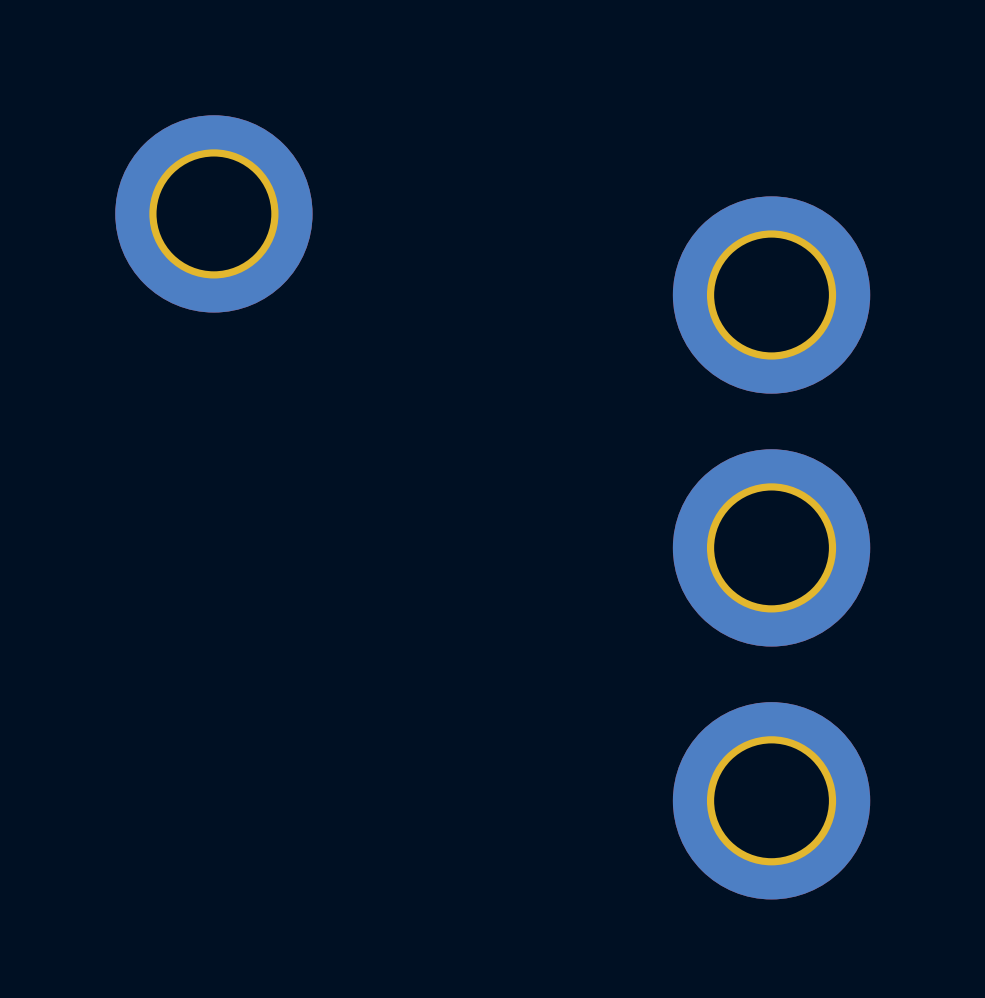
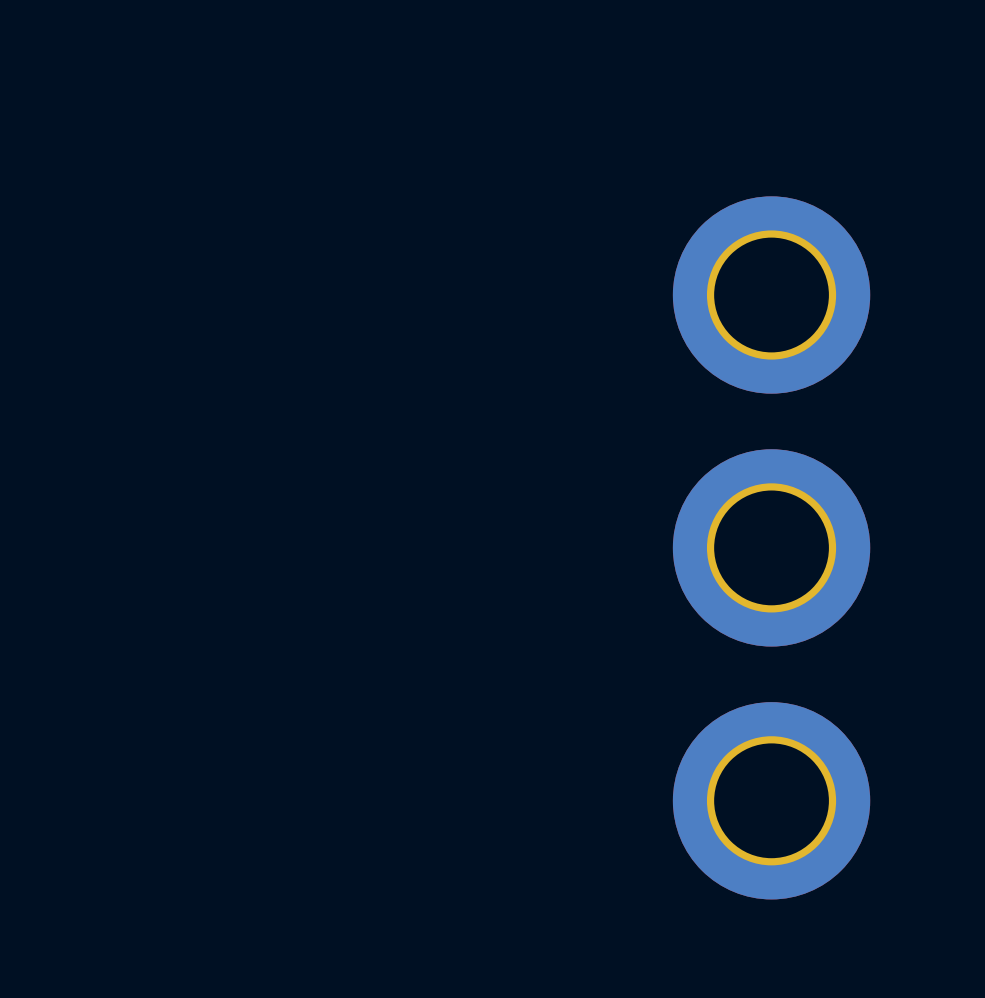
part: (213, 213) -> none

